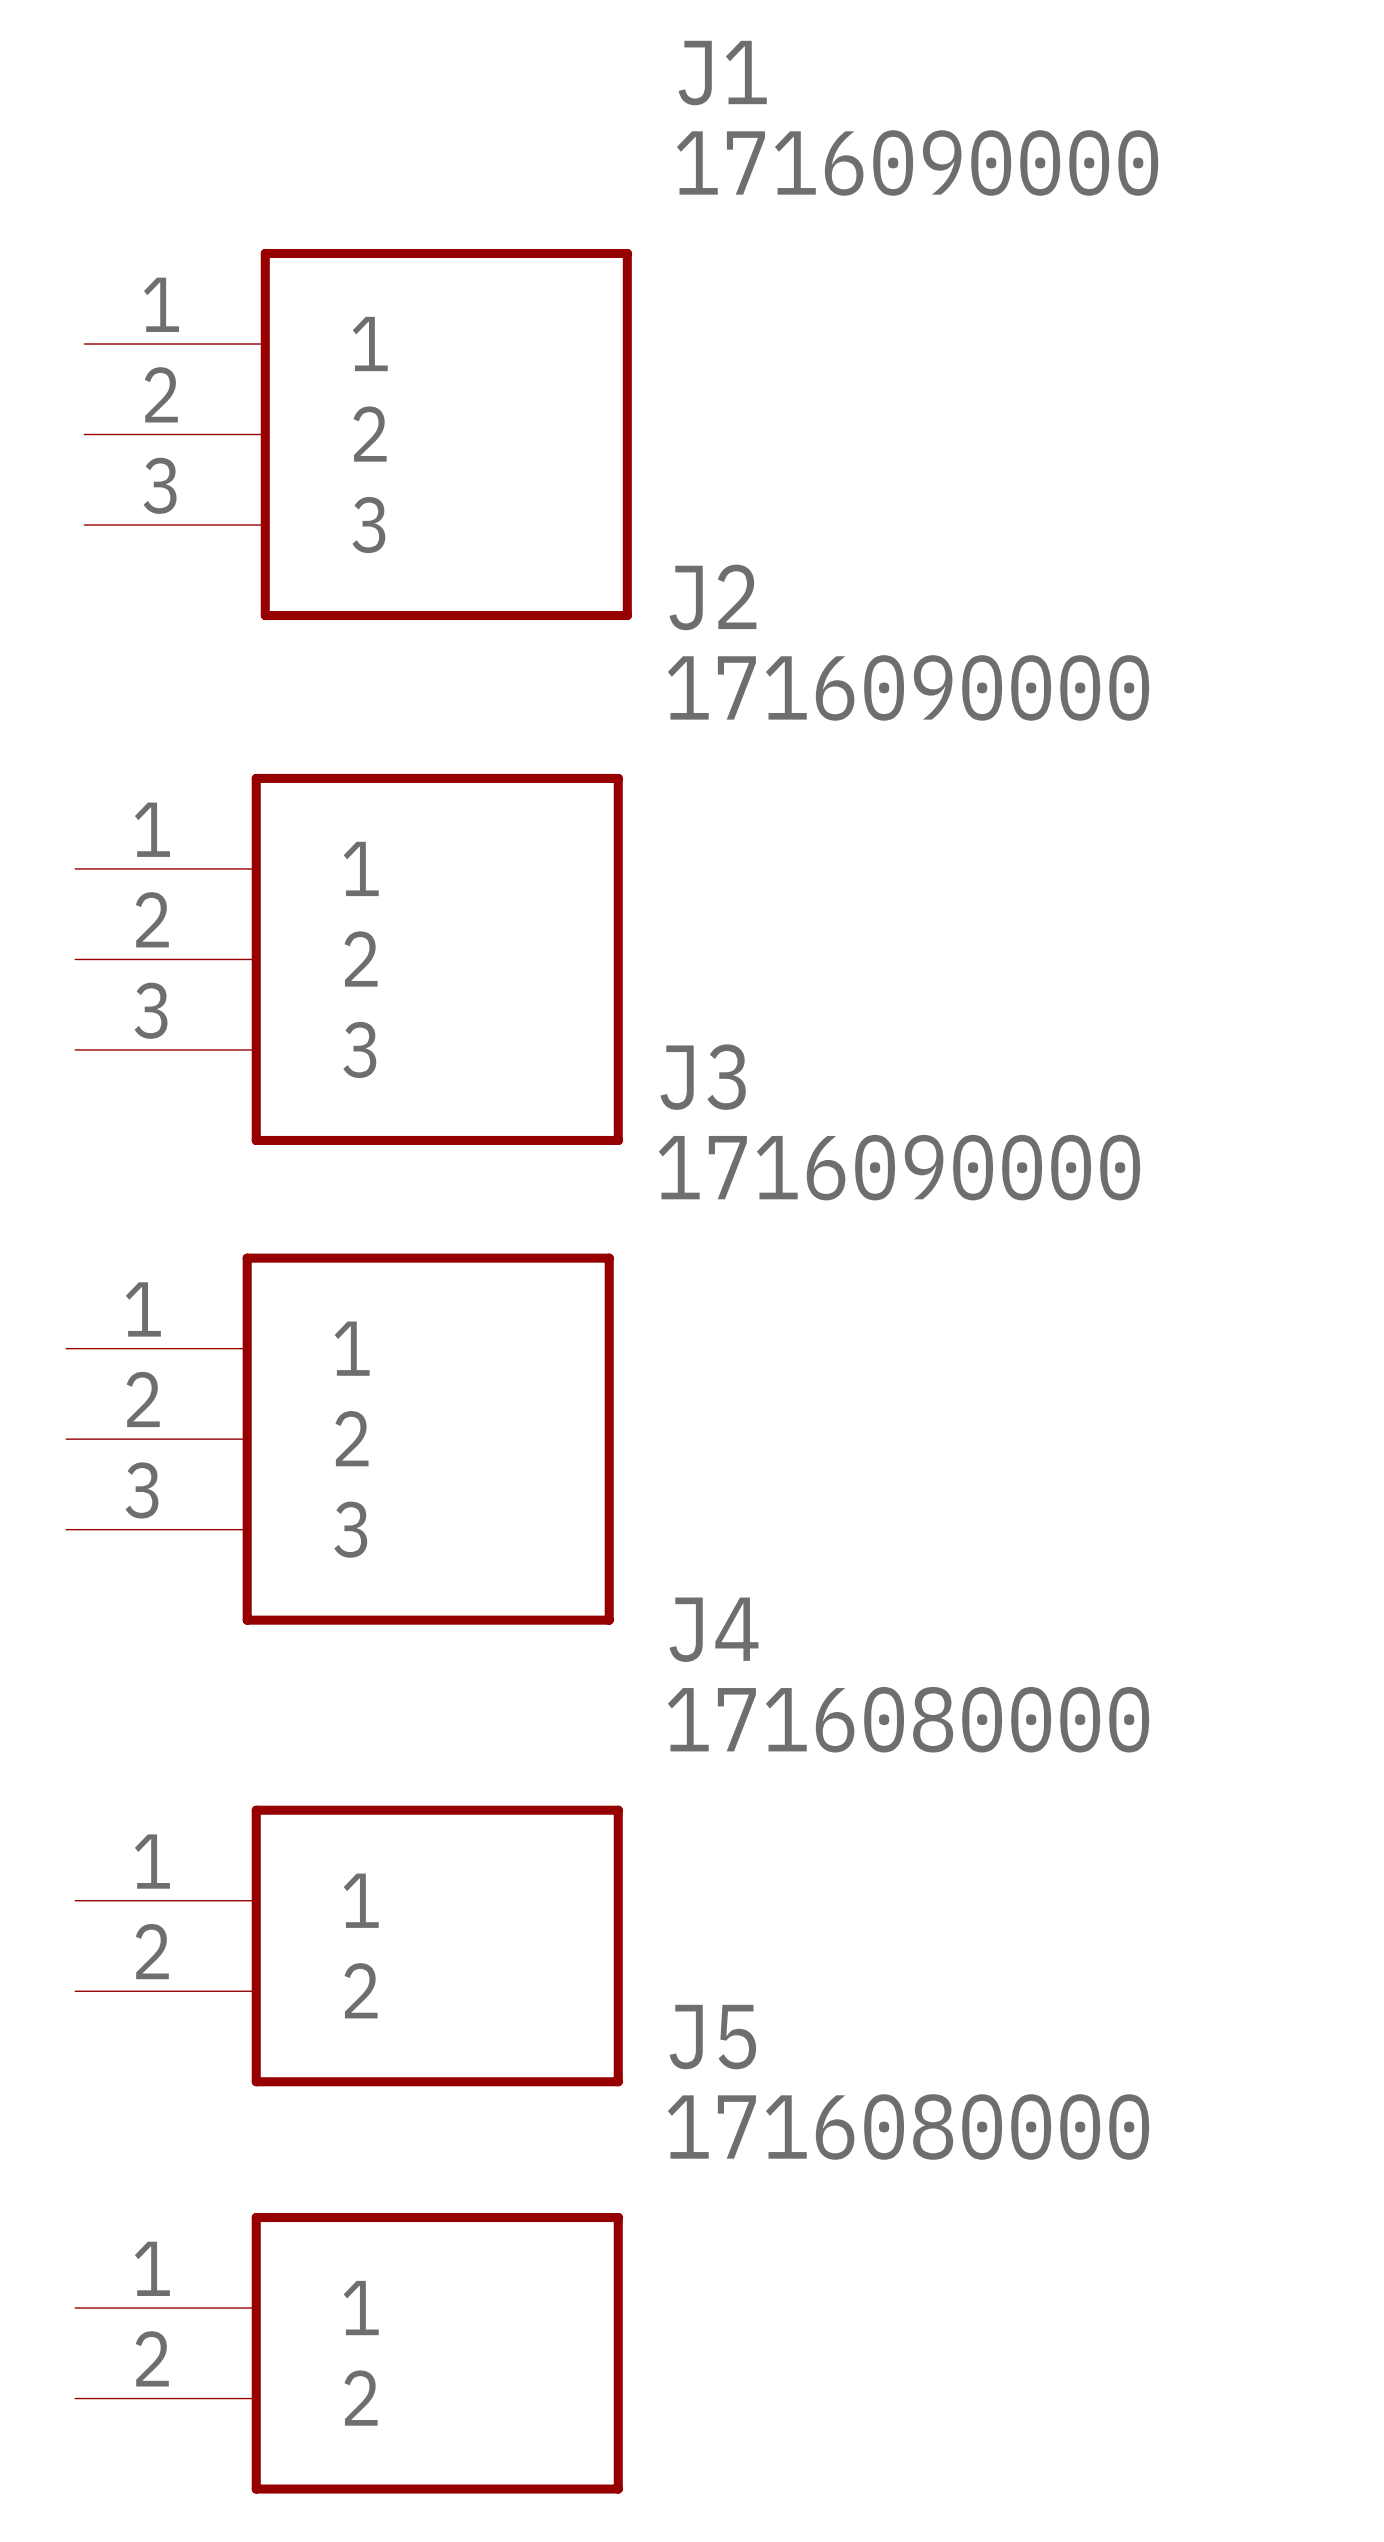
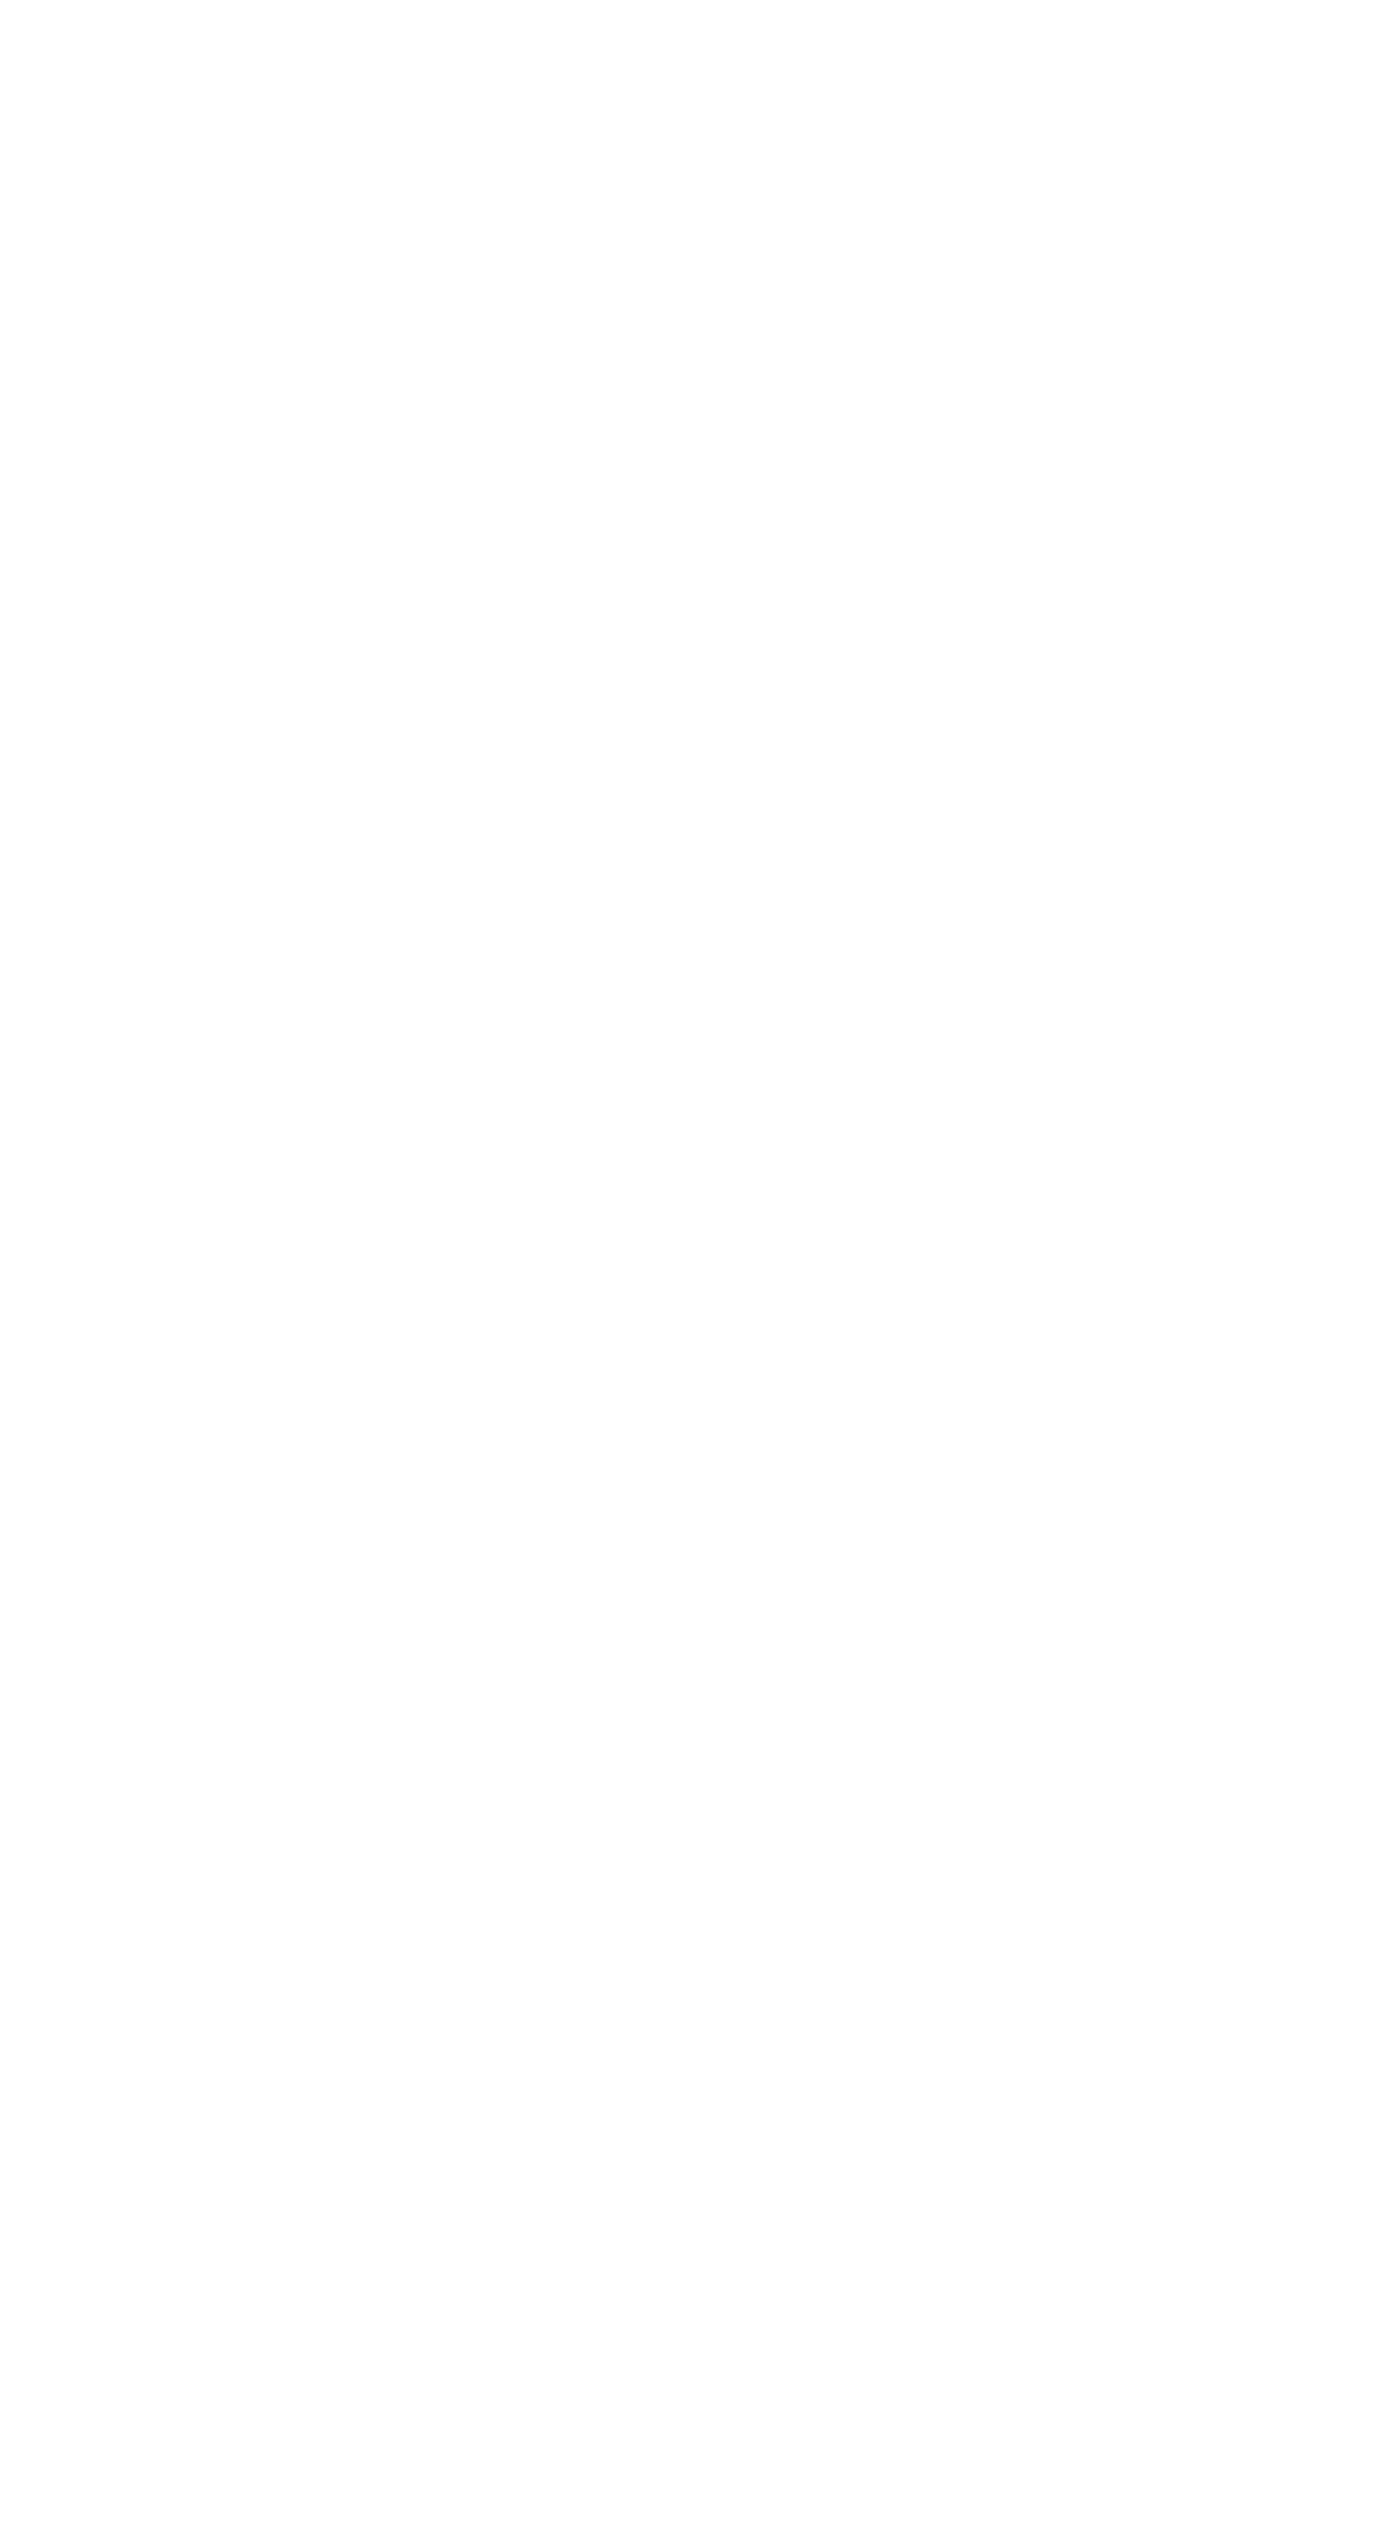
J1: 1716090000 (358, 434) -> none
J2: 1716090000 (349, 959) -> none
J3: 1716090000 (339, 1439) -> none
J4: 1716080000 (349, 1945) -> none
J5: 1716080000 (349, 2353) -> none

